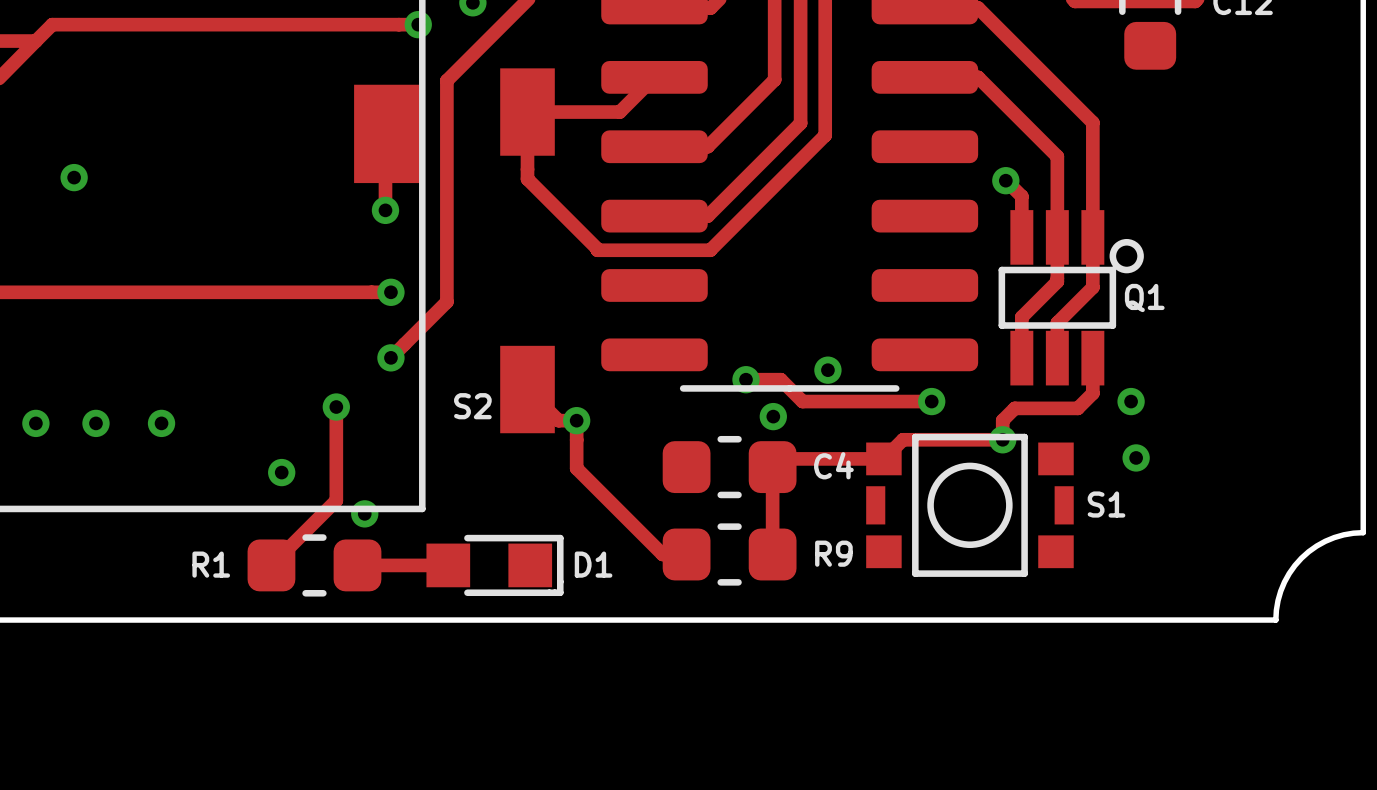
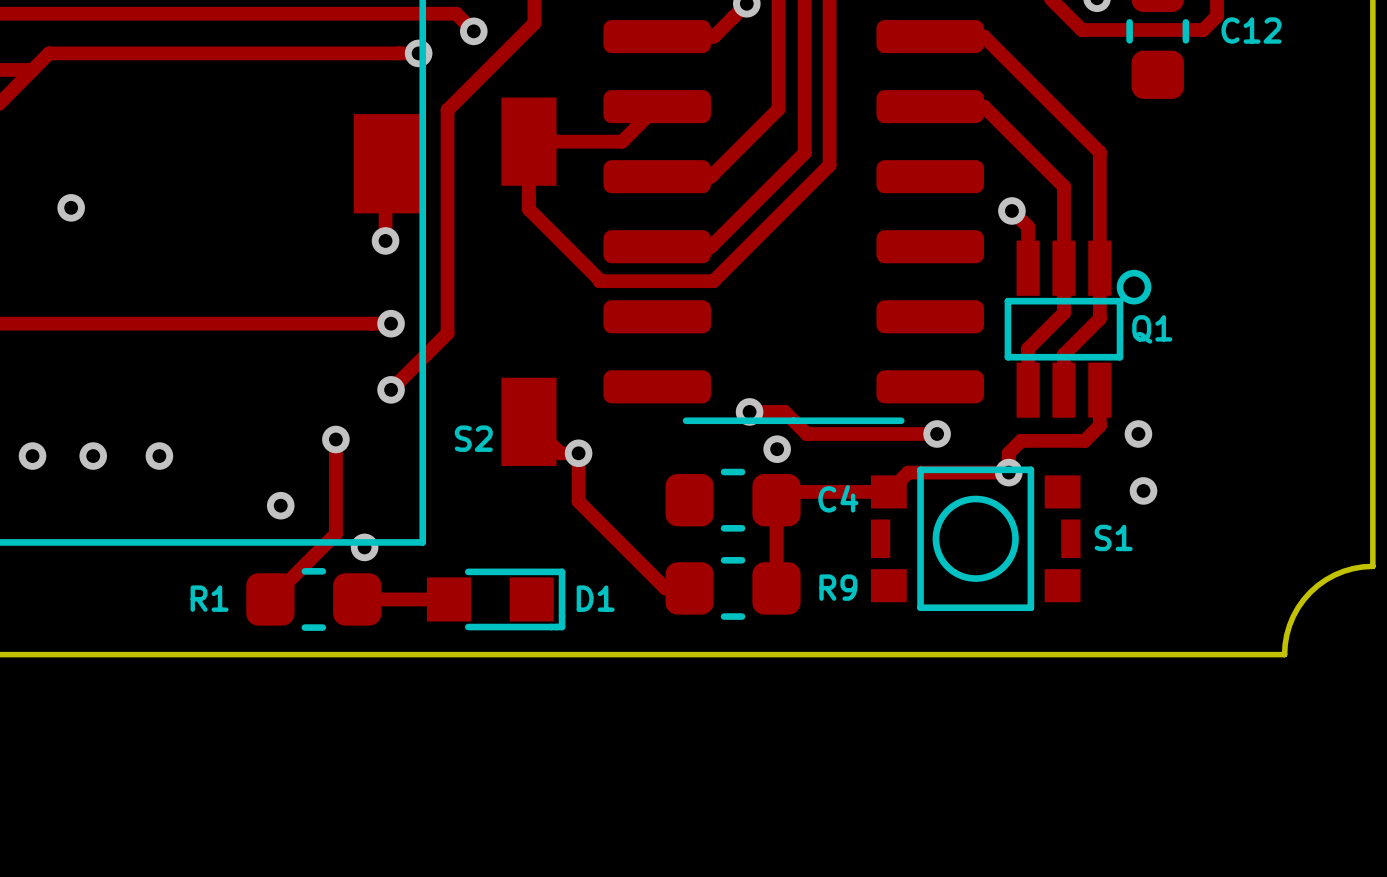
via: (827, 370) -> none

